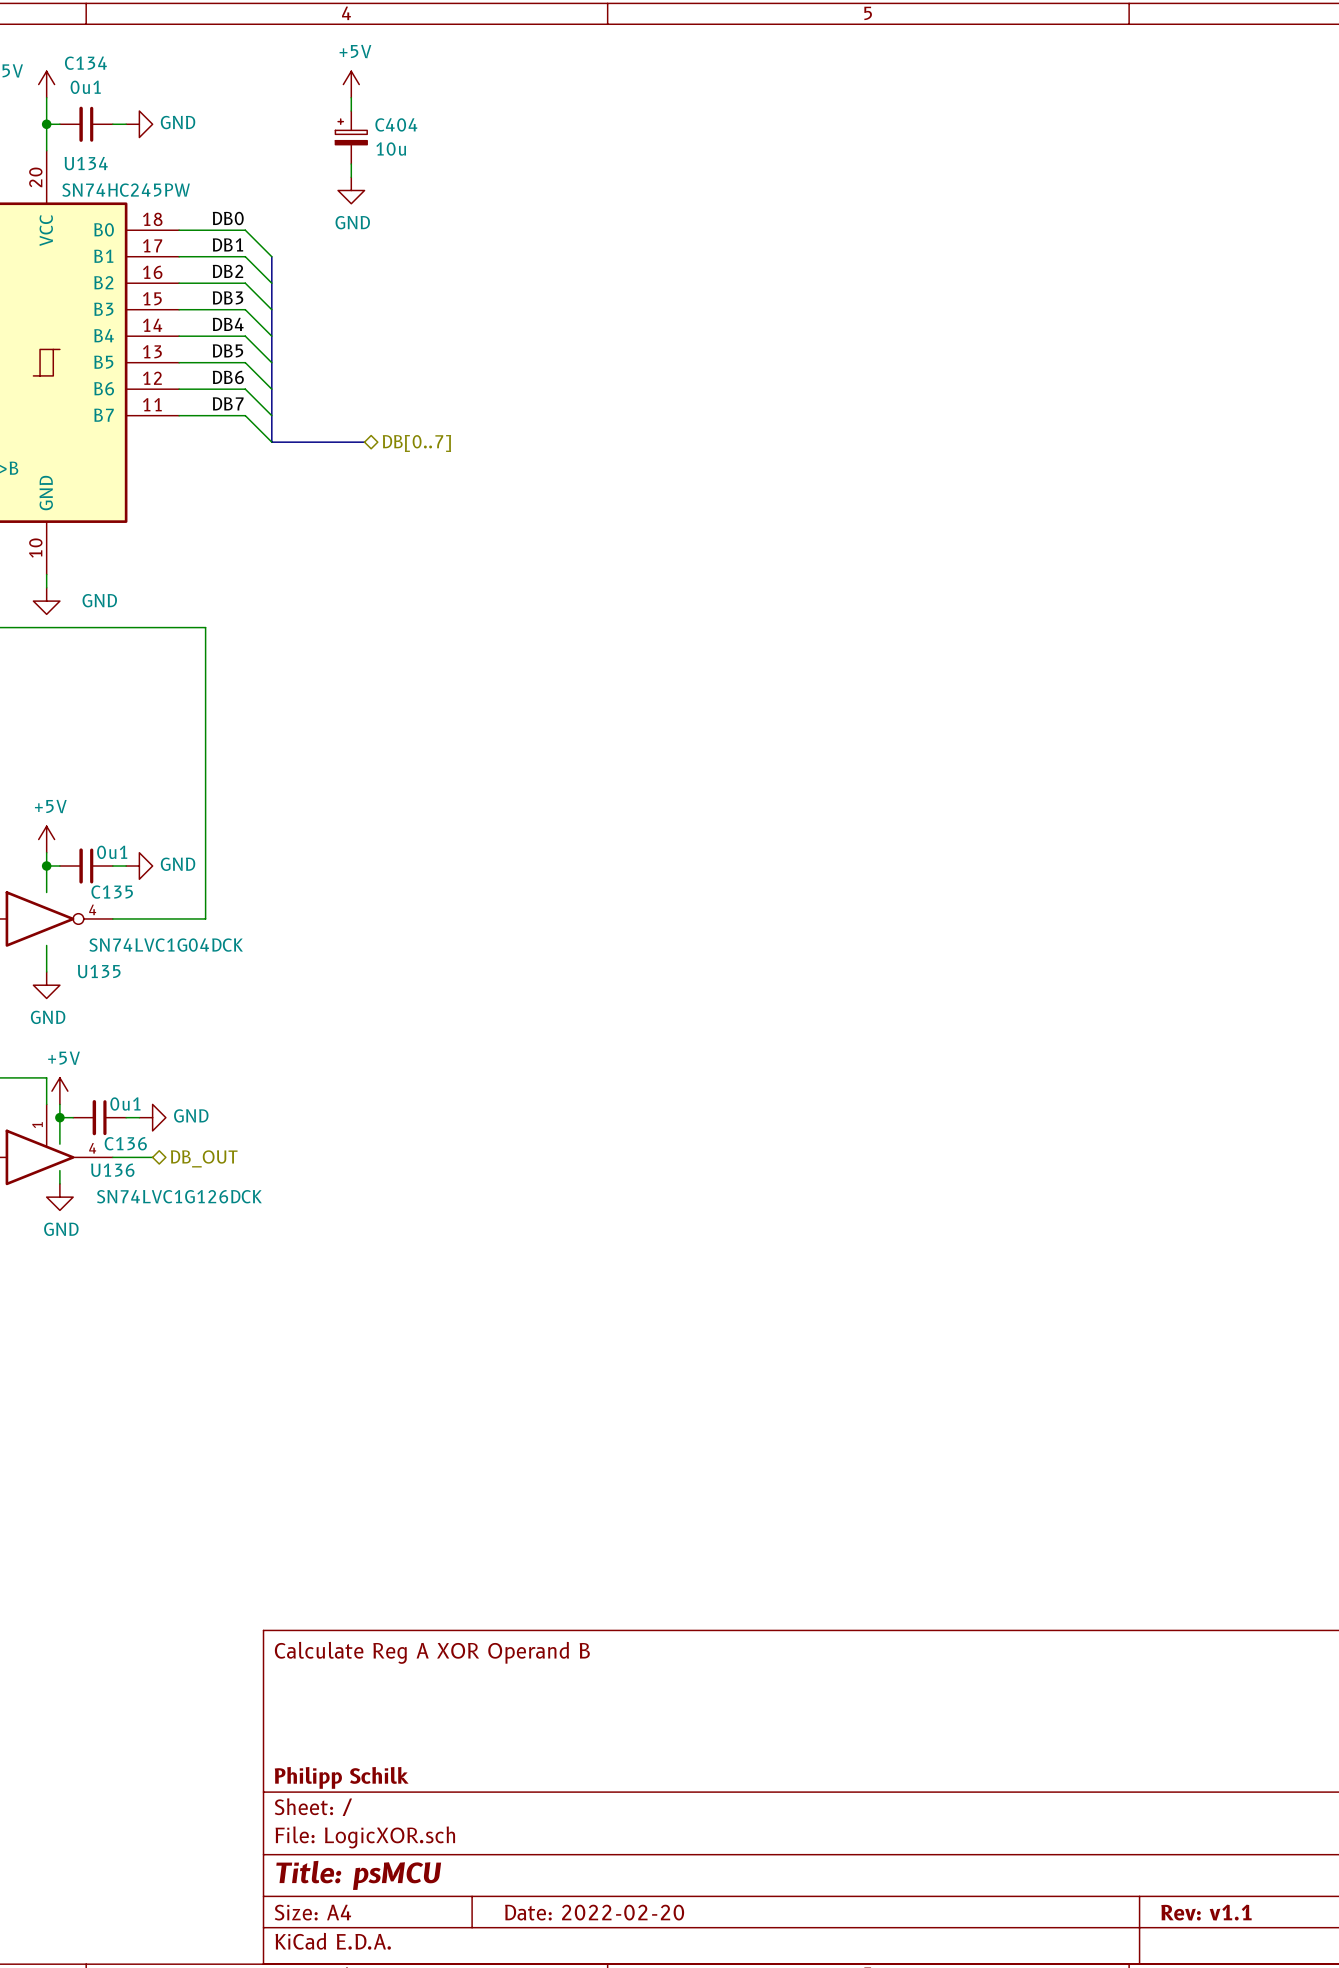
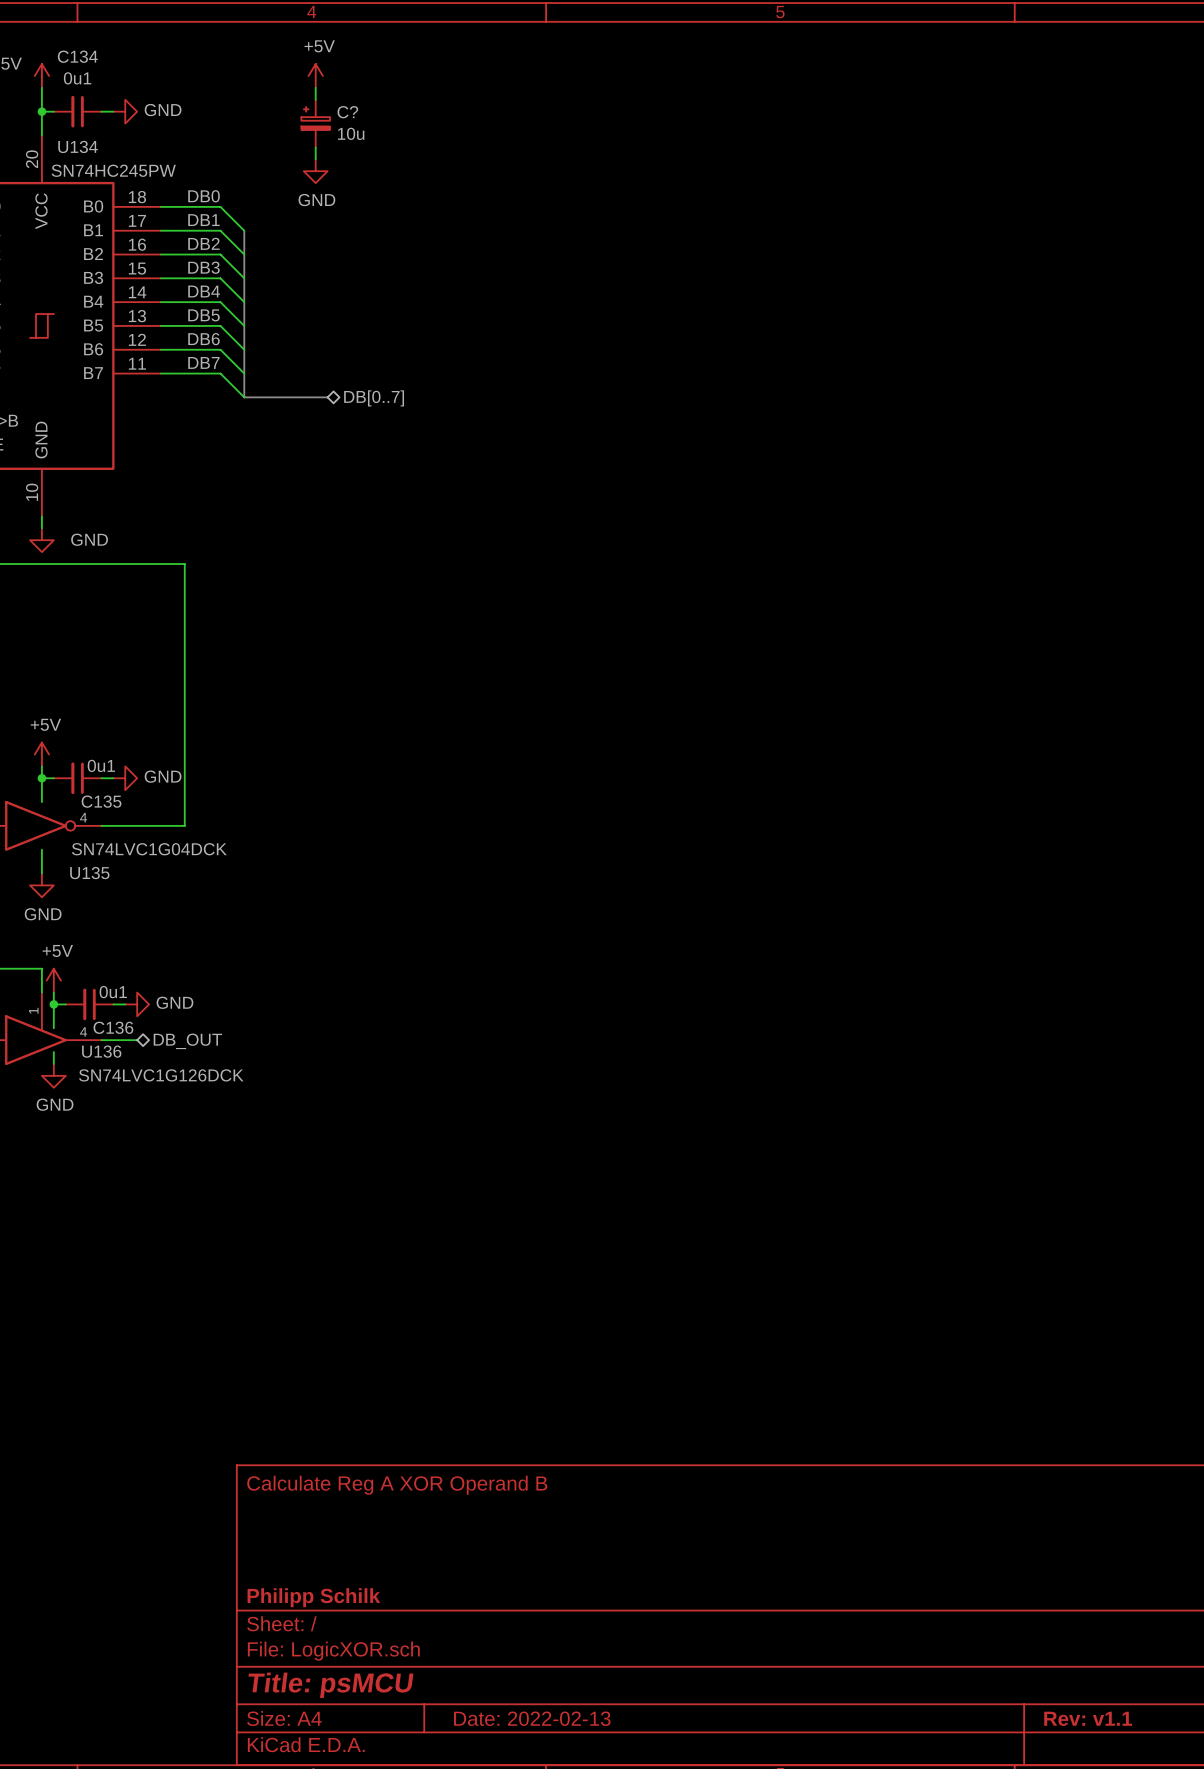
C404 name: C404 (396, 124) -> C? (347, 112)
title block: Date: 2022-02-20 (594, 1912) -> Date: 2022-02-13 (532, 1718)

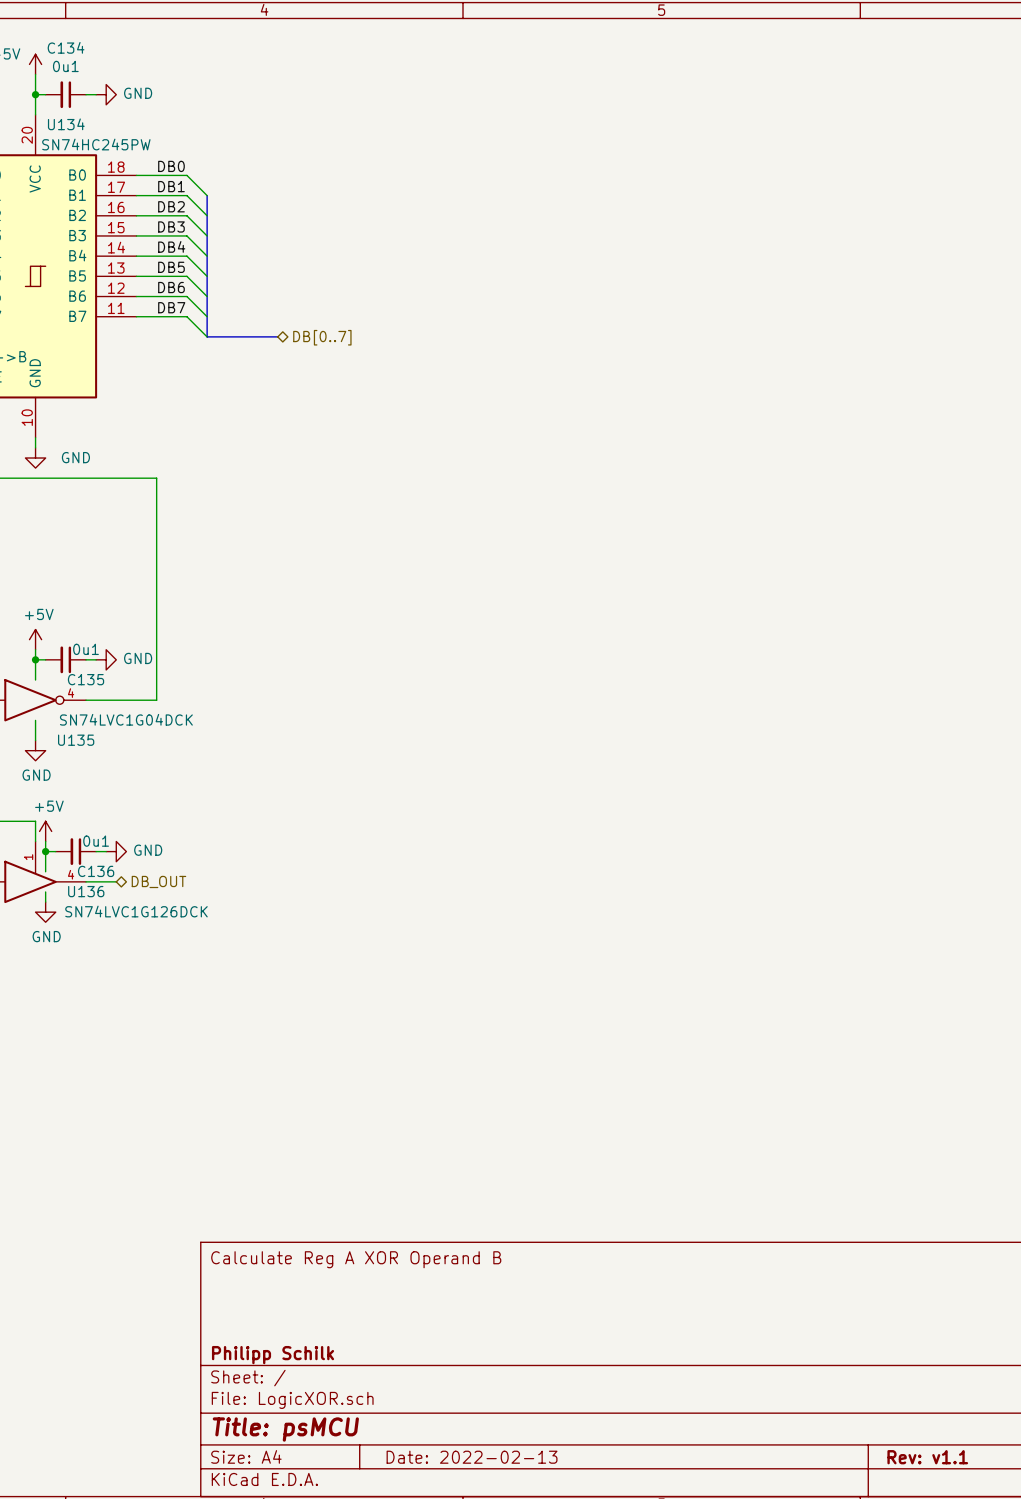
power symbol: +5V (315, 75) -> none
wire: (315, 87) (315, 99) -> none
C?: 10u (315, 123) -> none
wire: (315, 147) (315, 159) -> none
power symbol: GND (315, 171) -> none

